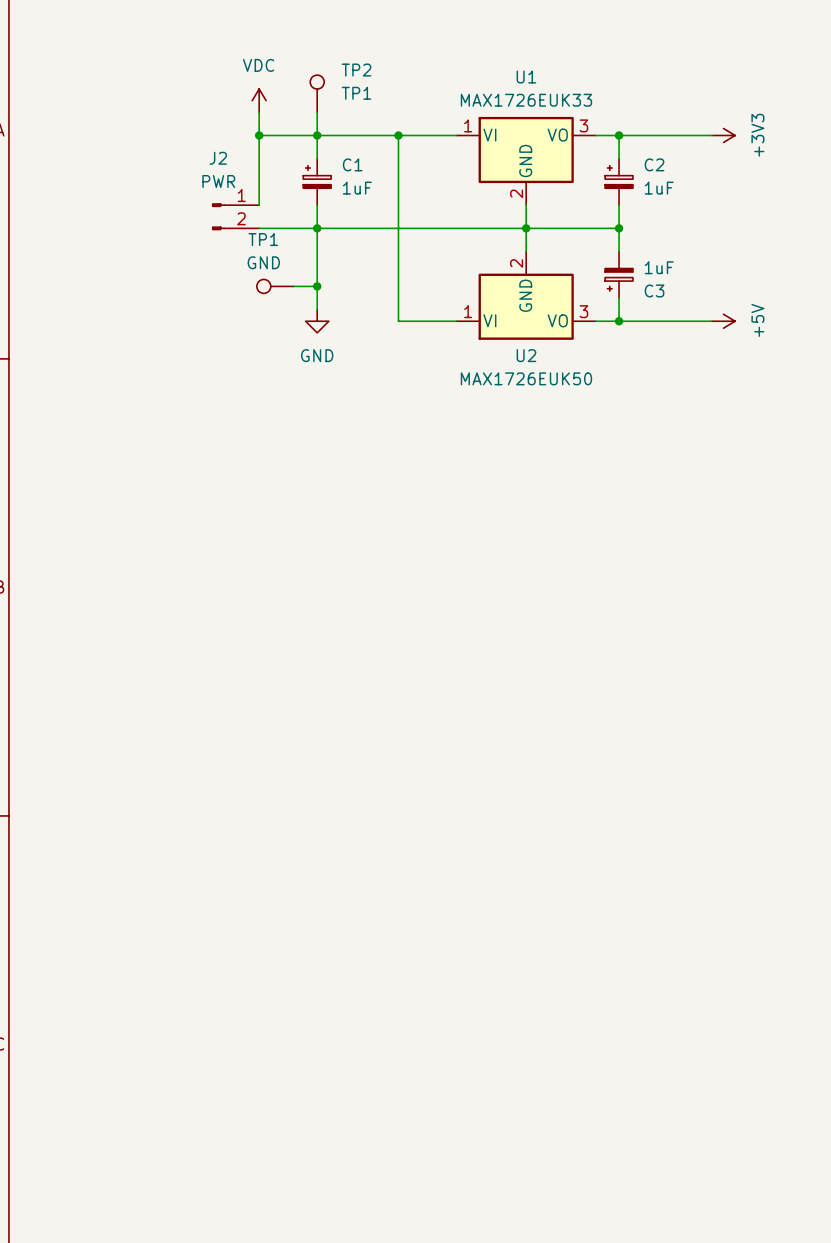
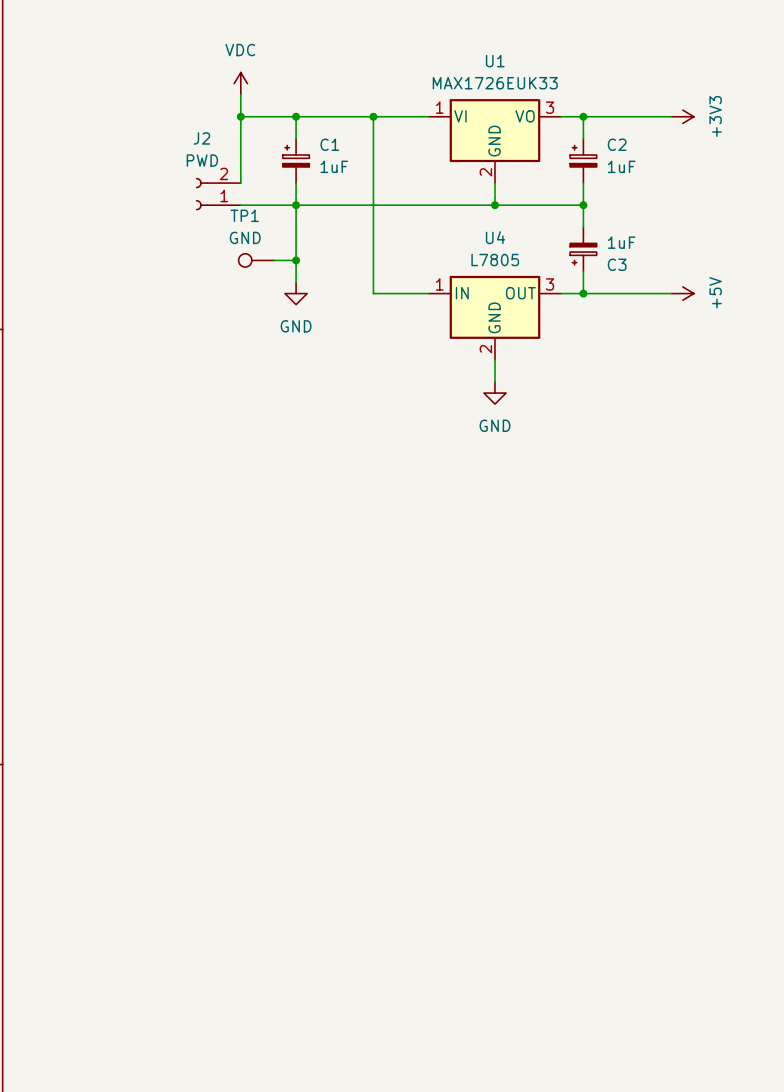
TP2: TP1 (317, 93) -> none
wire: (317, 112) (317, 135) -> none
J2 value: PWR (218, 181) -> PWD (202, 160)
J2 symbol: [212, 203, 260, 231] -> [195, 177, 241, 211]
wire: (526, 228) (526, 251) -> (494, 359) (494, 382)
U2: MAX1726EUK50 (526, 295) -> none
U4: none -> L7805 (494, 317)
power symbol: none -> GND (494, 393)

